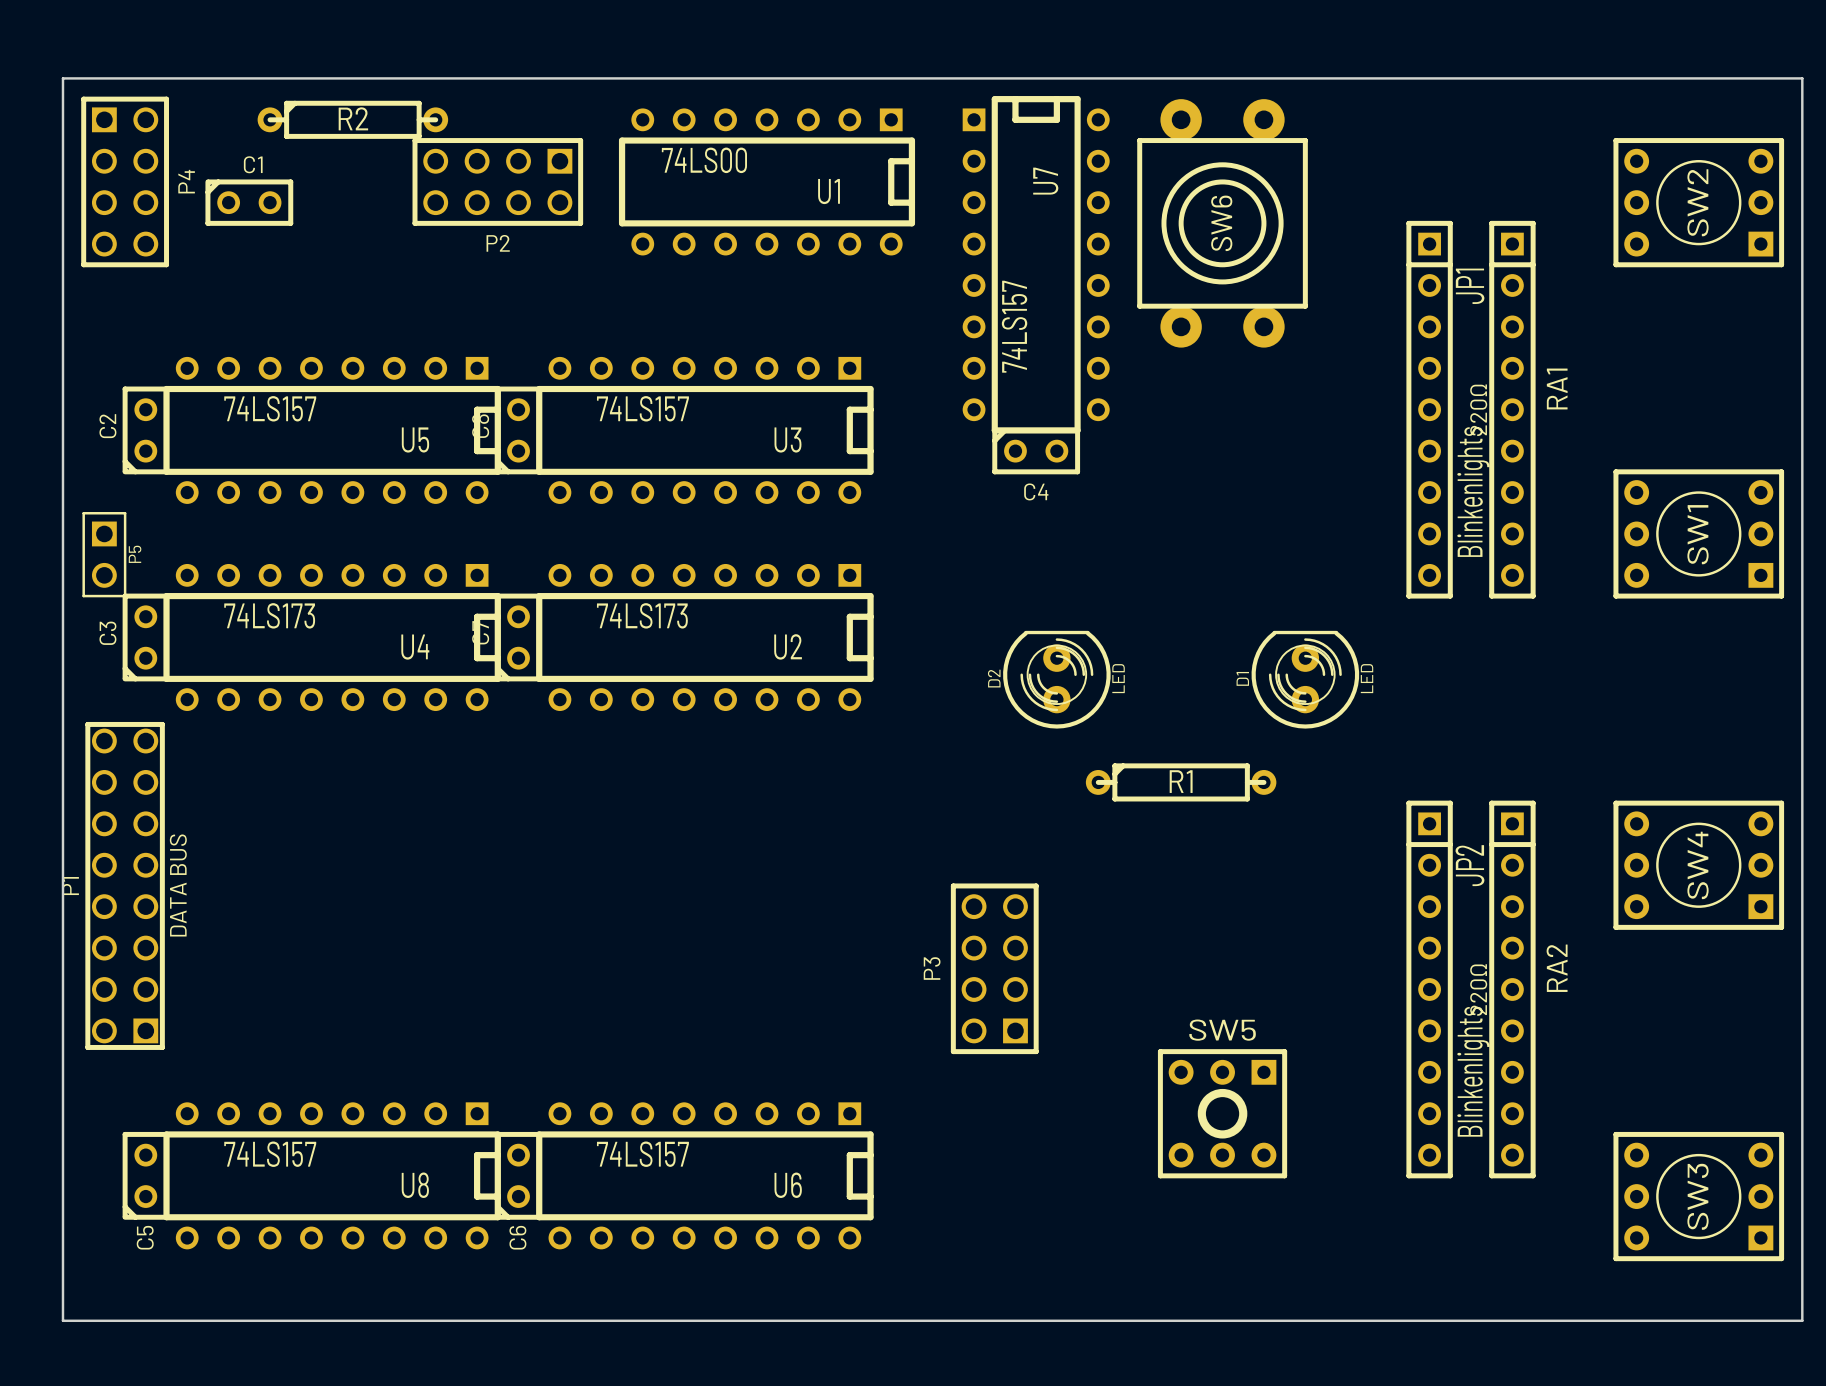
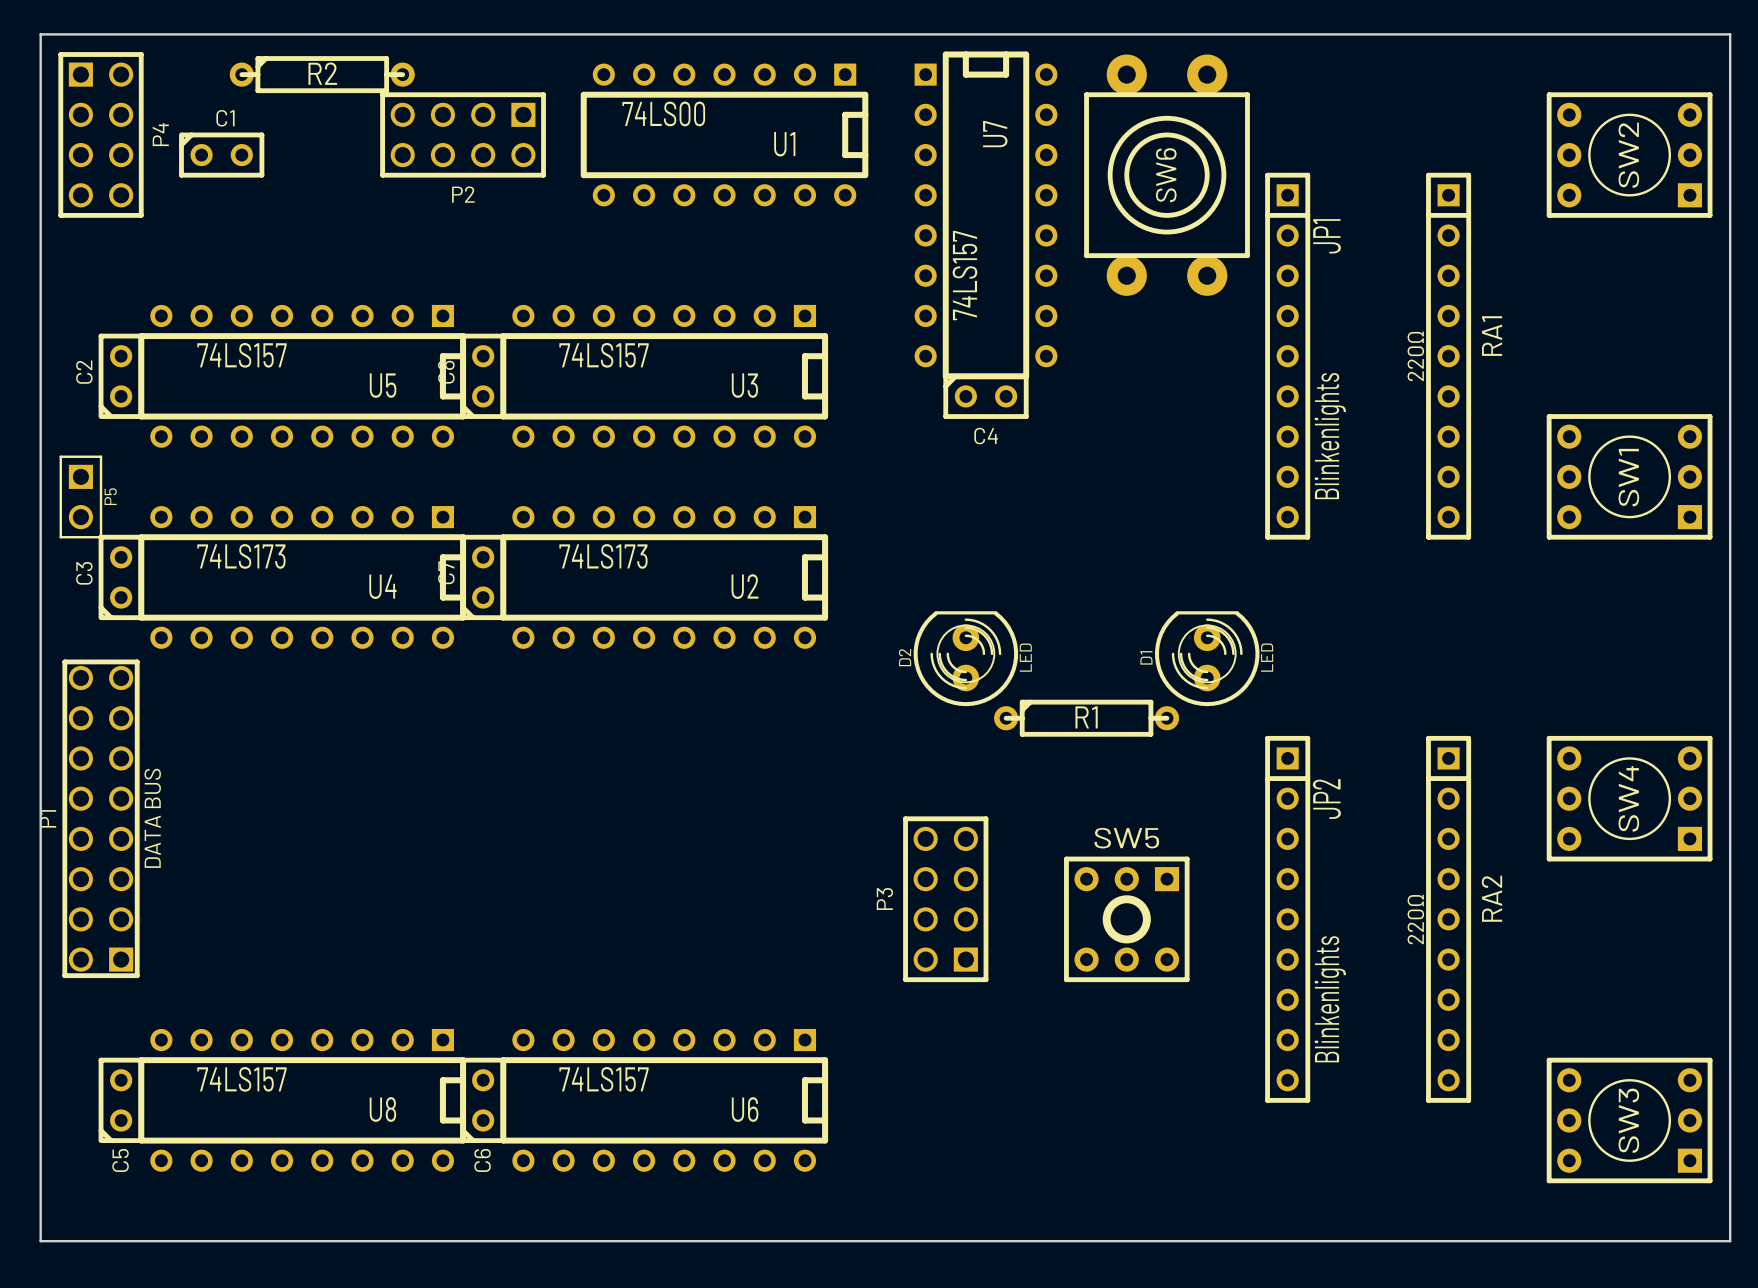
JP1 position: (1429, 409) -> (1287, 356)
D2 position: (1056, 679) -> (965, 658)
D1 position: (1305, 679) -> (1207, 658)
R1 position: (1181, 782) -> (1086, 718)
JP2 position: (1429, 989) -> (1287, 919)
SW5 position: (1222, 1113) -> (1126, 919)

